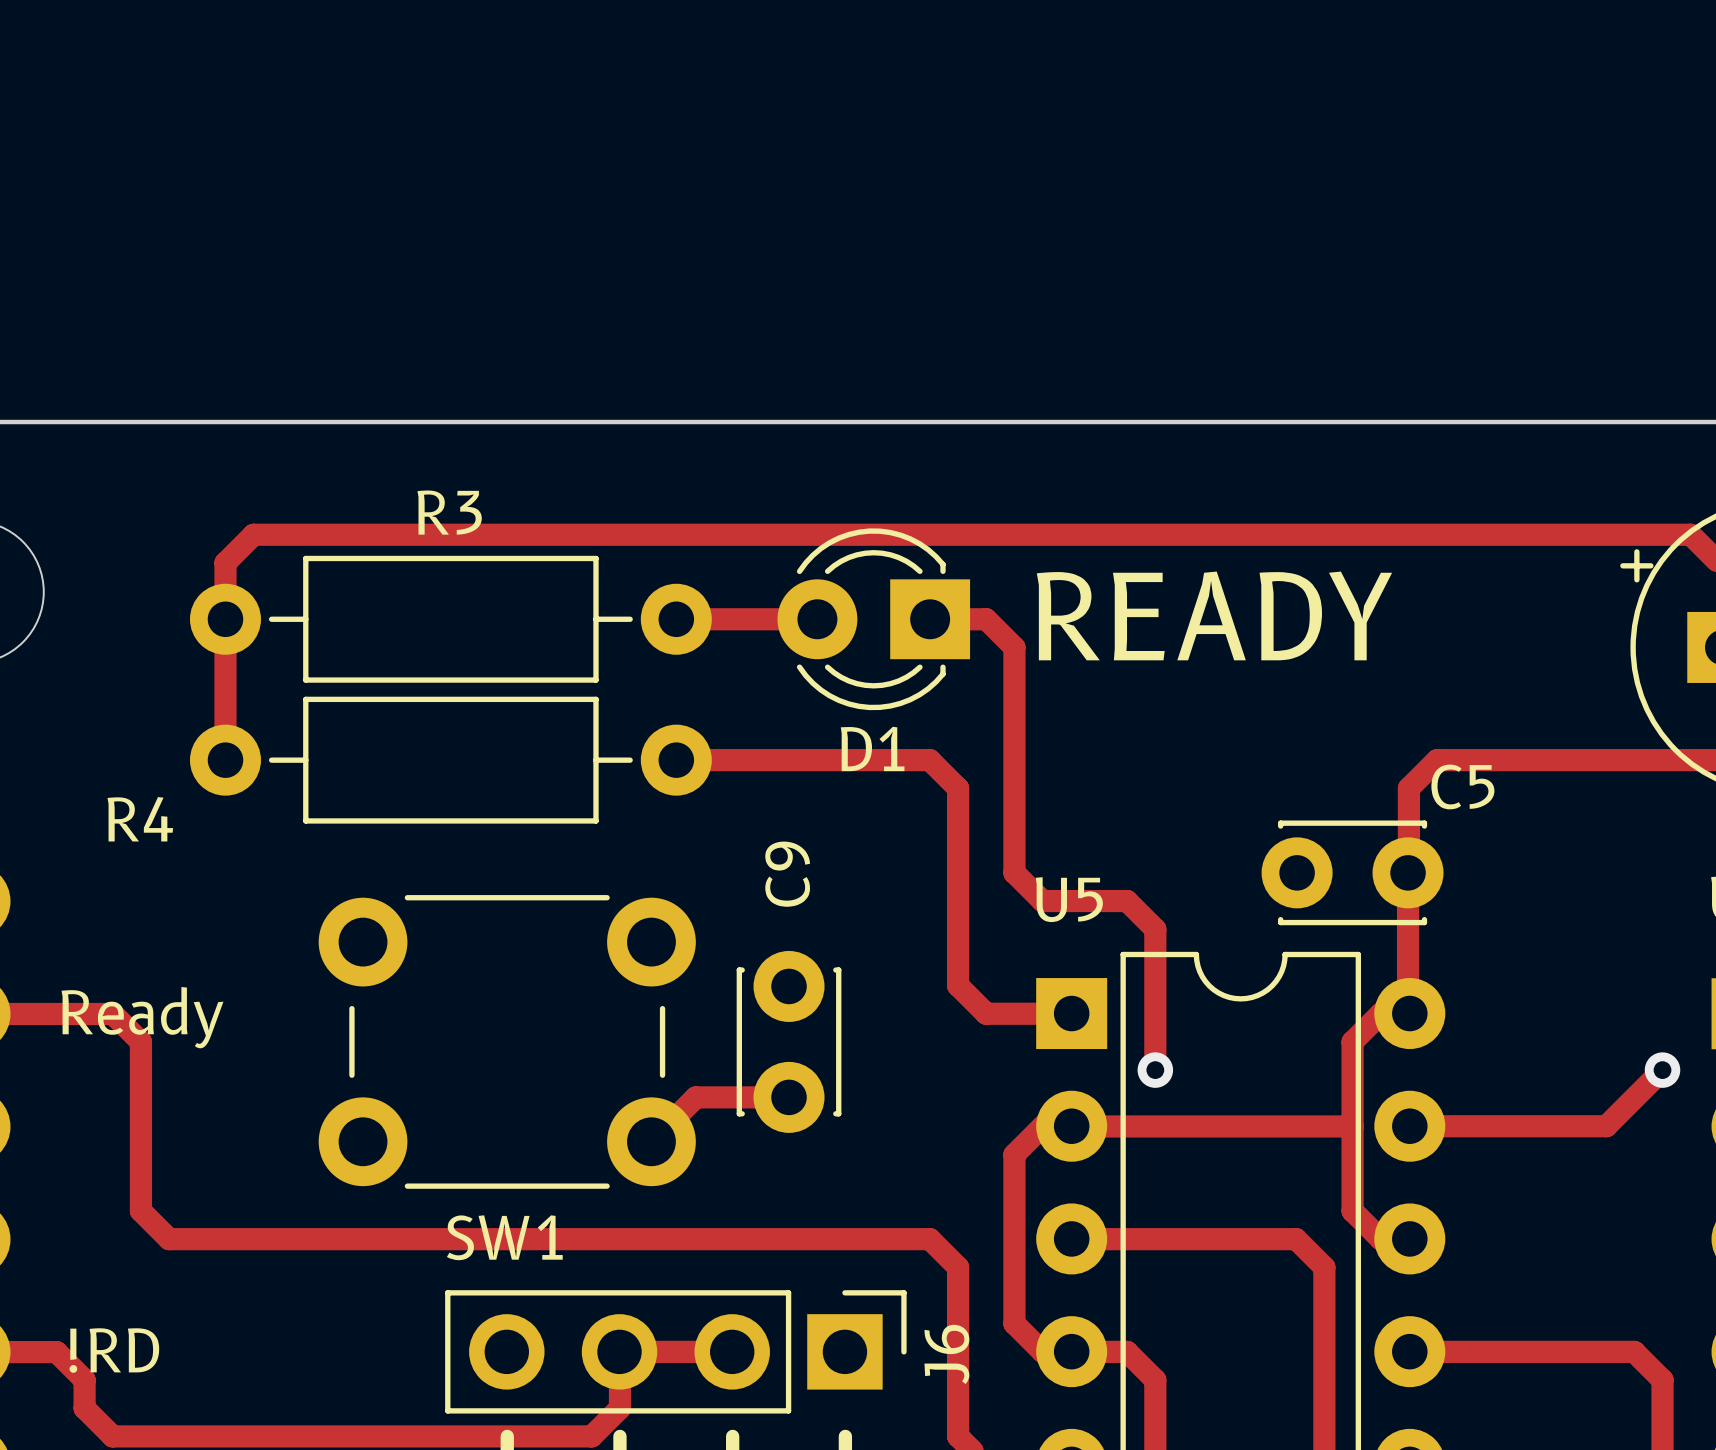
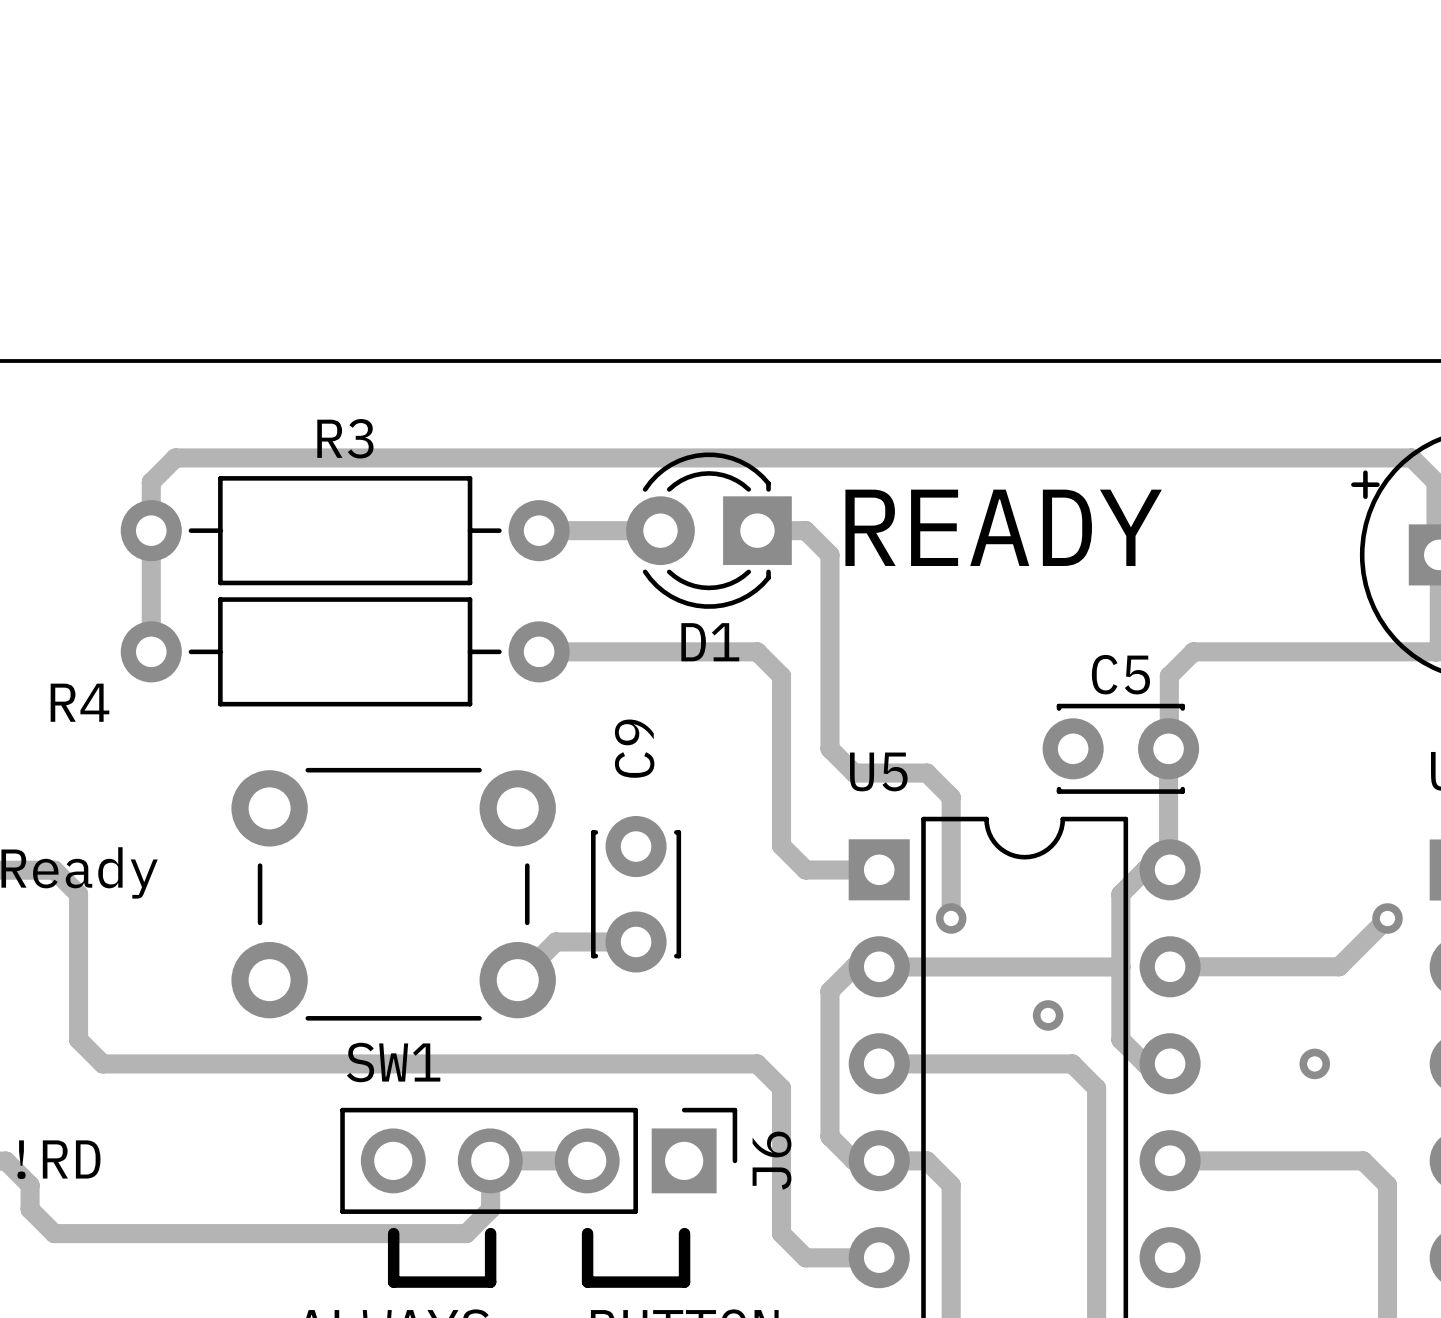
C5 name position: C5 (1462, 786) -> C5 (1120, 674)
via: none -> (1048, 1015)
via: none -> (1314, 1063)

